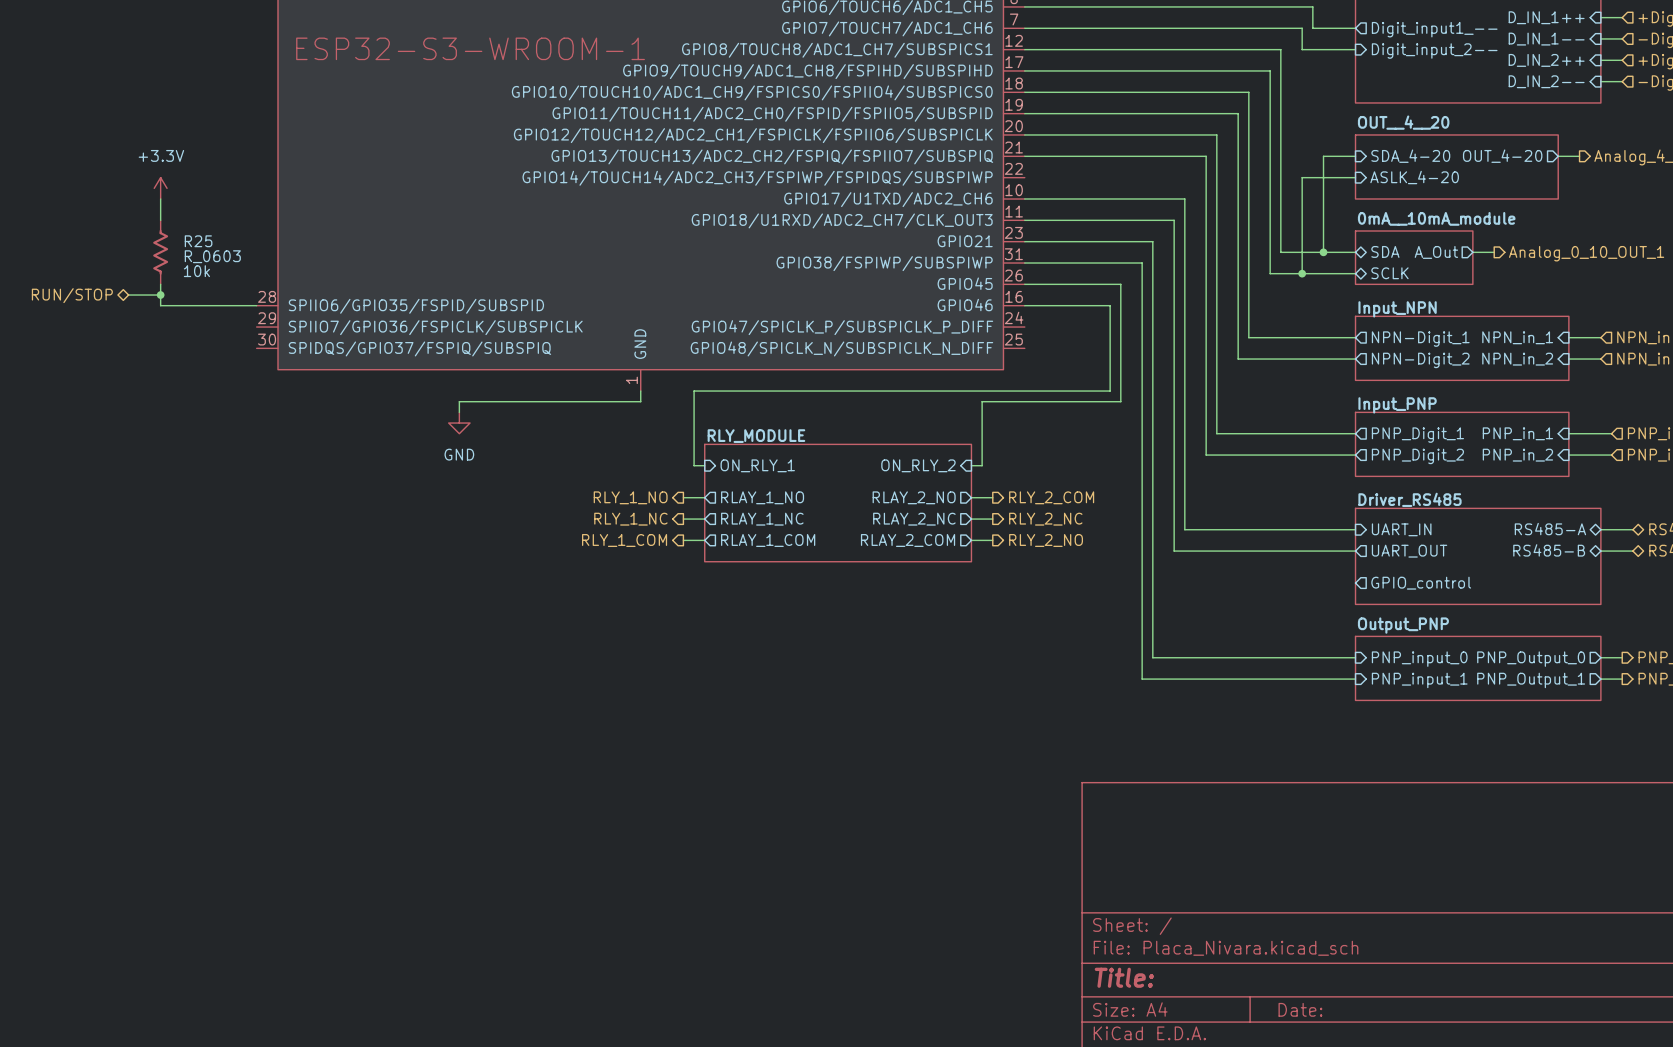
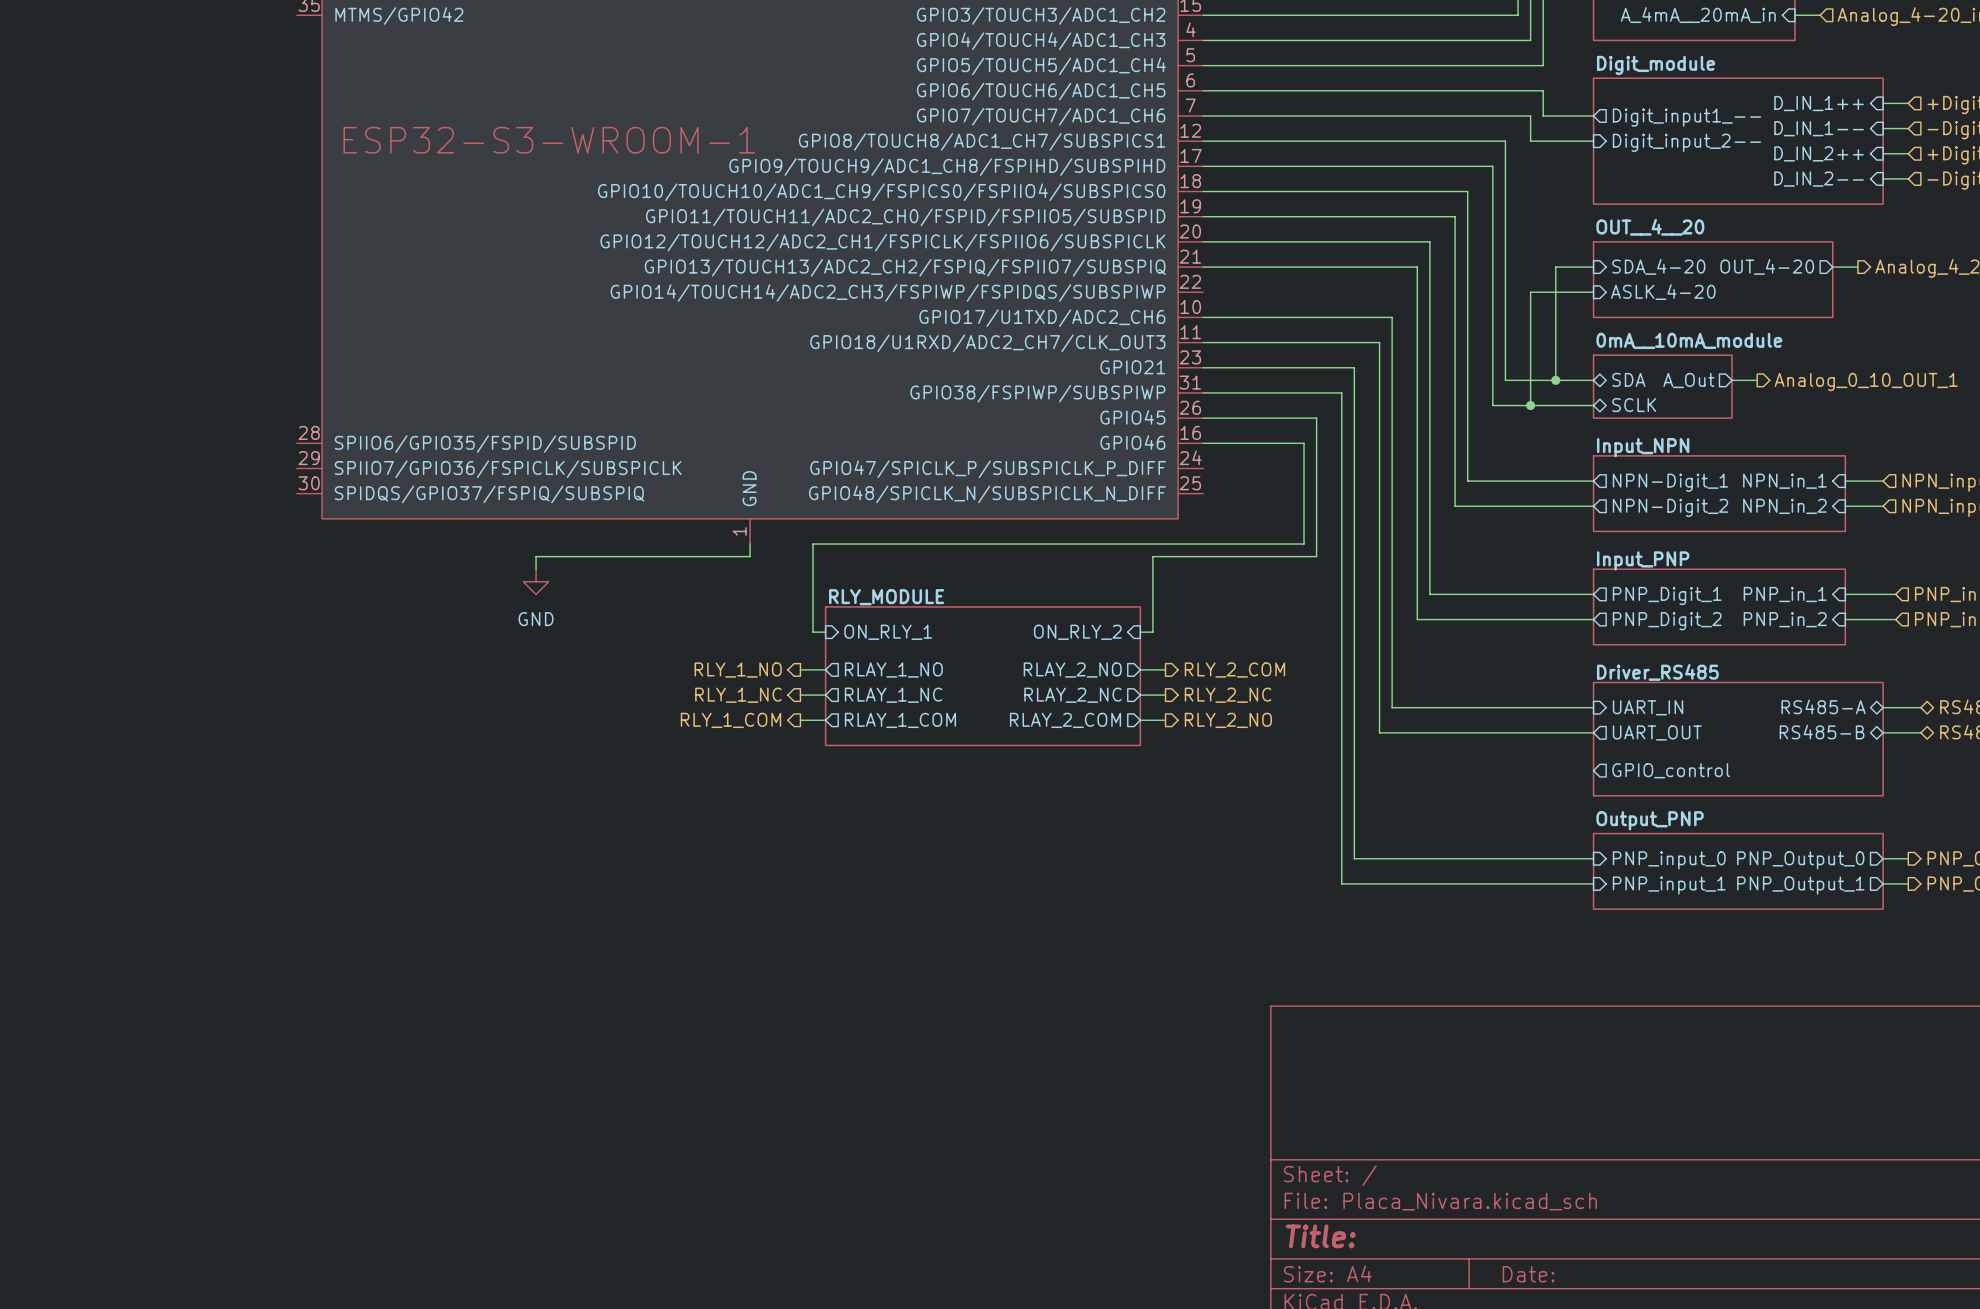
power symbol: +3.3V (160, 188) -> none
wire: (160, 198) (160, 220) -> none
R25: R_0603 (160, 252) -> none
wire: (160, 284) (160, 305) (256, 305) -> none
hierarchical label: RUN/STOP (72, 295) -> none
wire: (128, 295) (160, 295) -> none
junction: (160, 295) -> none

